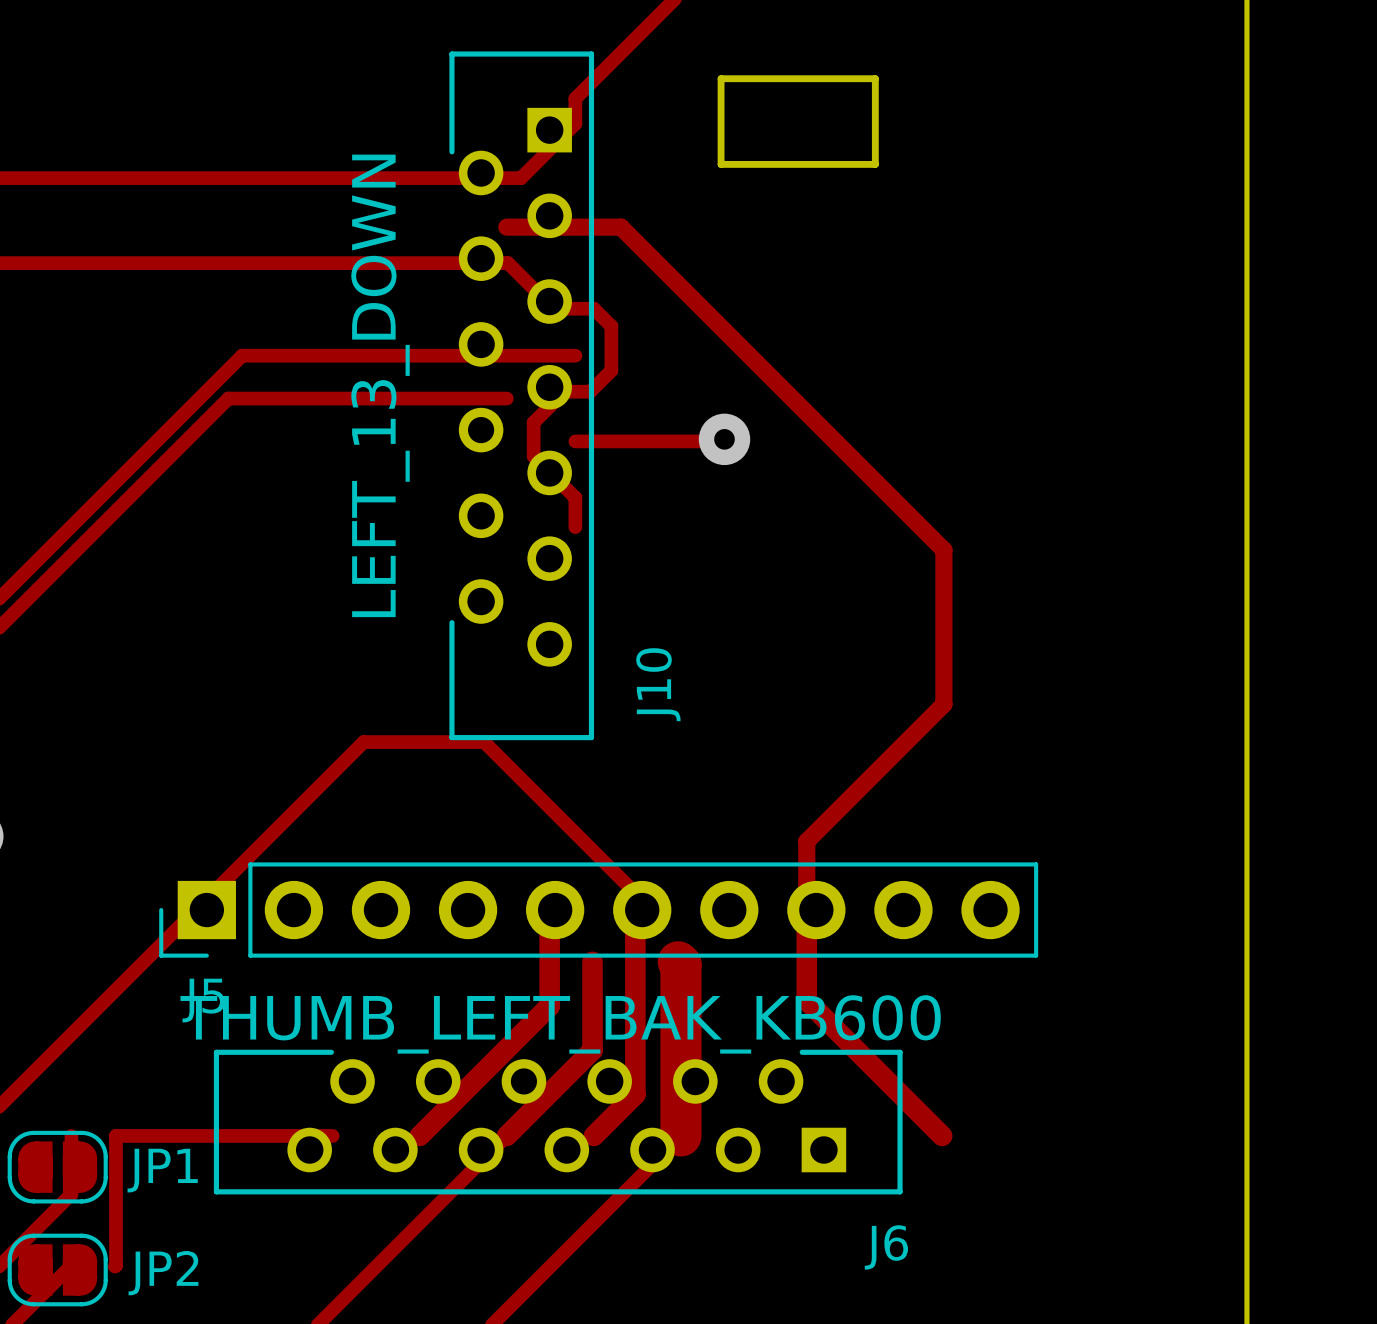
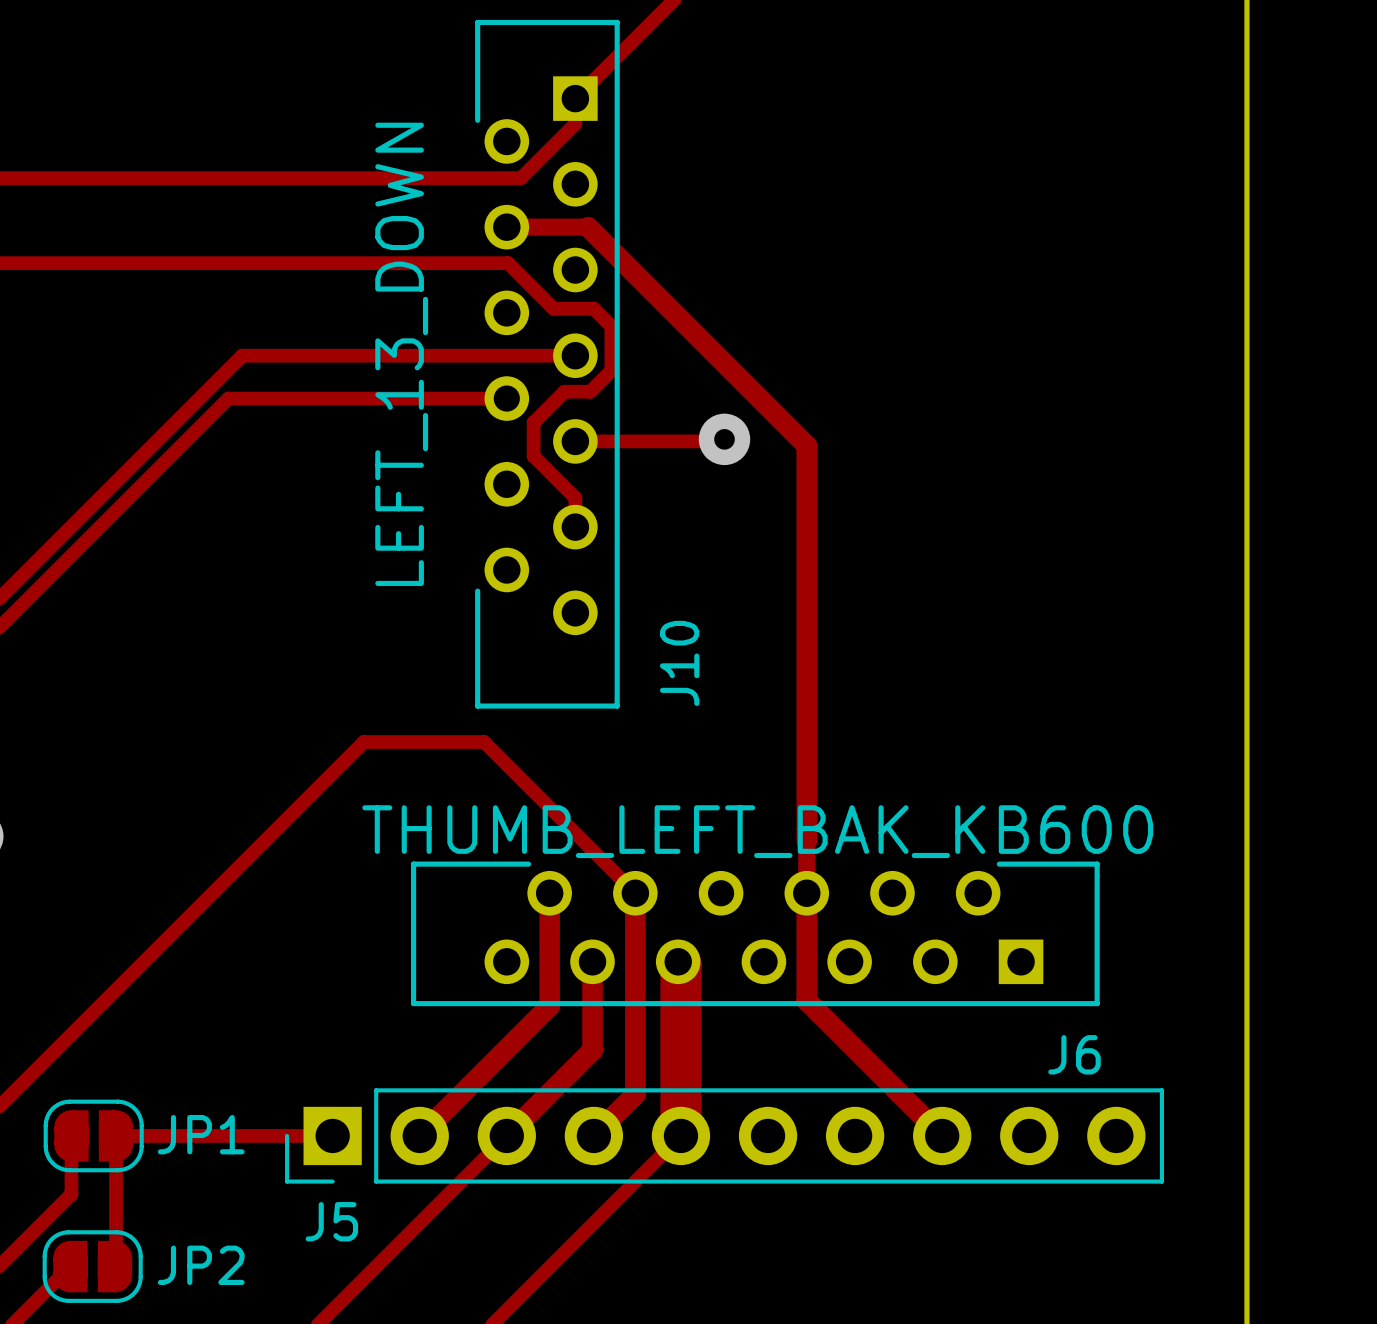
board edge: (721, 78) (721, 164) (875, 164) (875, 78) (721, 78) -> none
track: (588, 227) (620, 227) (943, 550) (943, 704) (806, 841) -> (588, 227) (806, 445) (806, 841)
J10 position: (521, 395) -> (547, 364)
J5 position: (598, 910) -> (724, 1135)
J6 position: (558, 1122) -> (755, 933)
JP1 position: (57, 1167) -> (93, 1135)
JP2 position: (57, 1270) -> (92, 1266)

